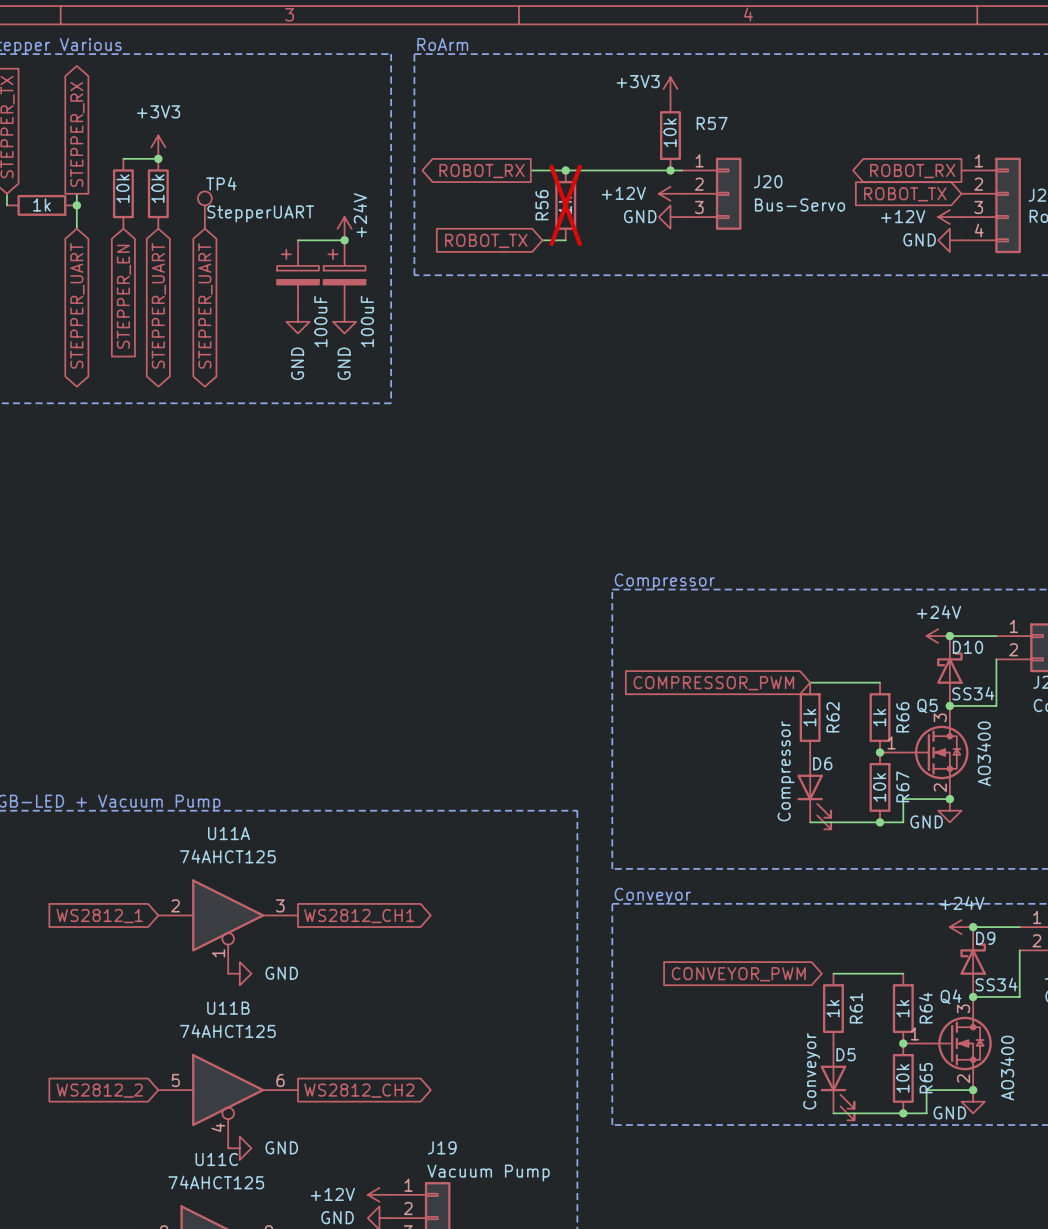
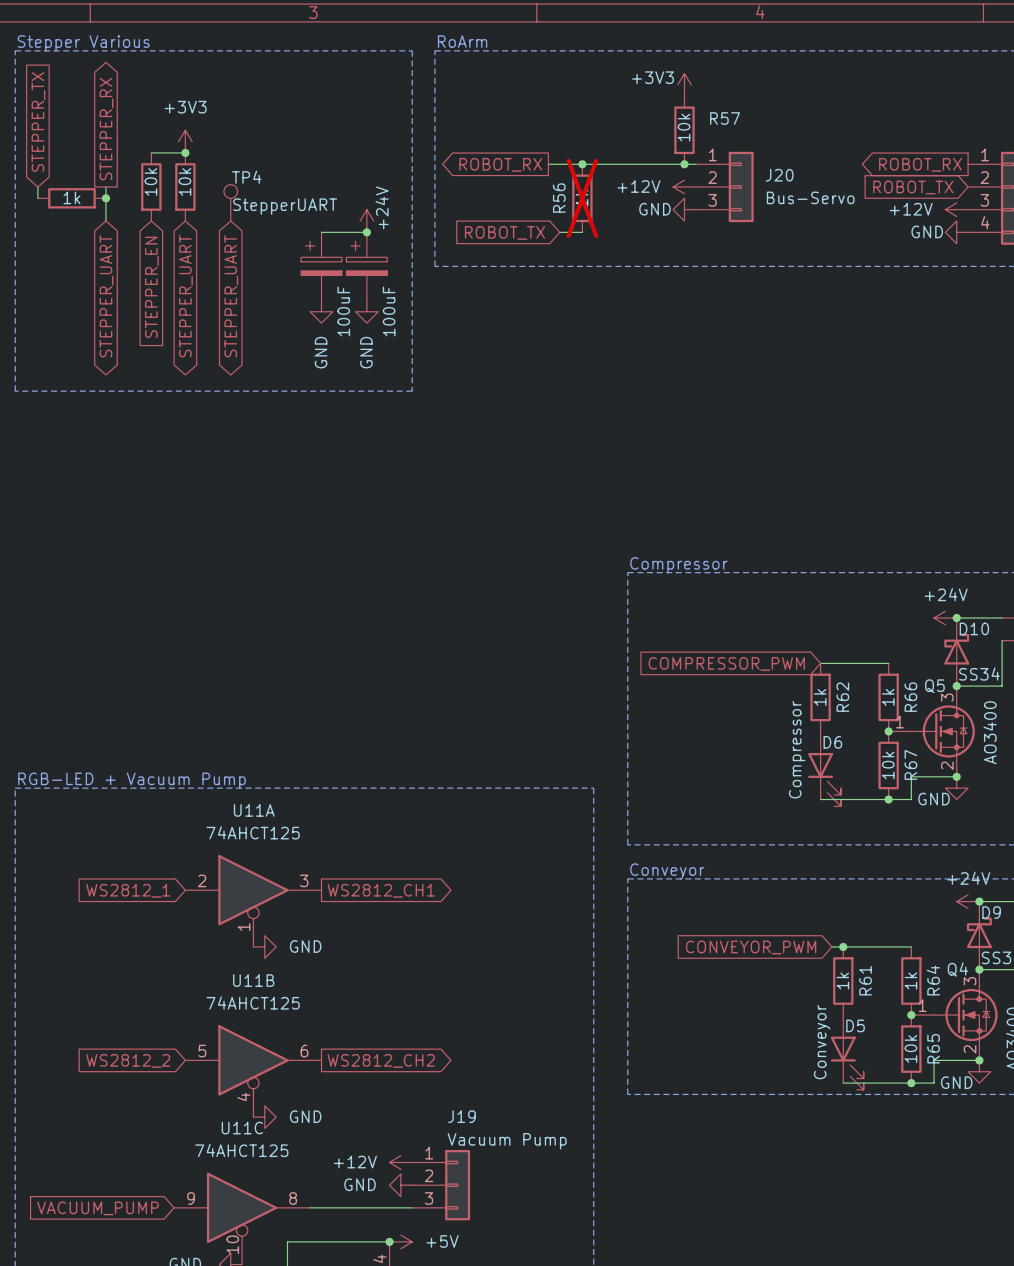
wire: none -> (831, 946) (843, 946)
junction: none -> (843, 946)

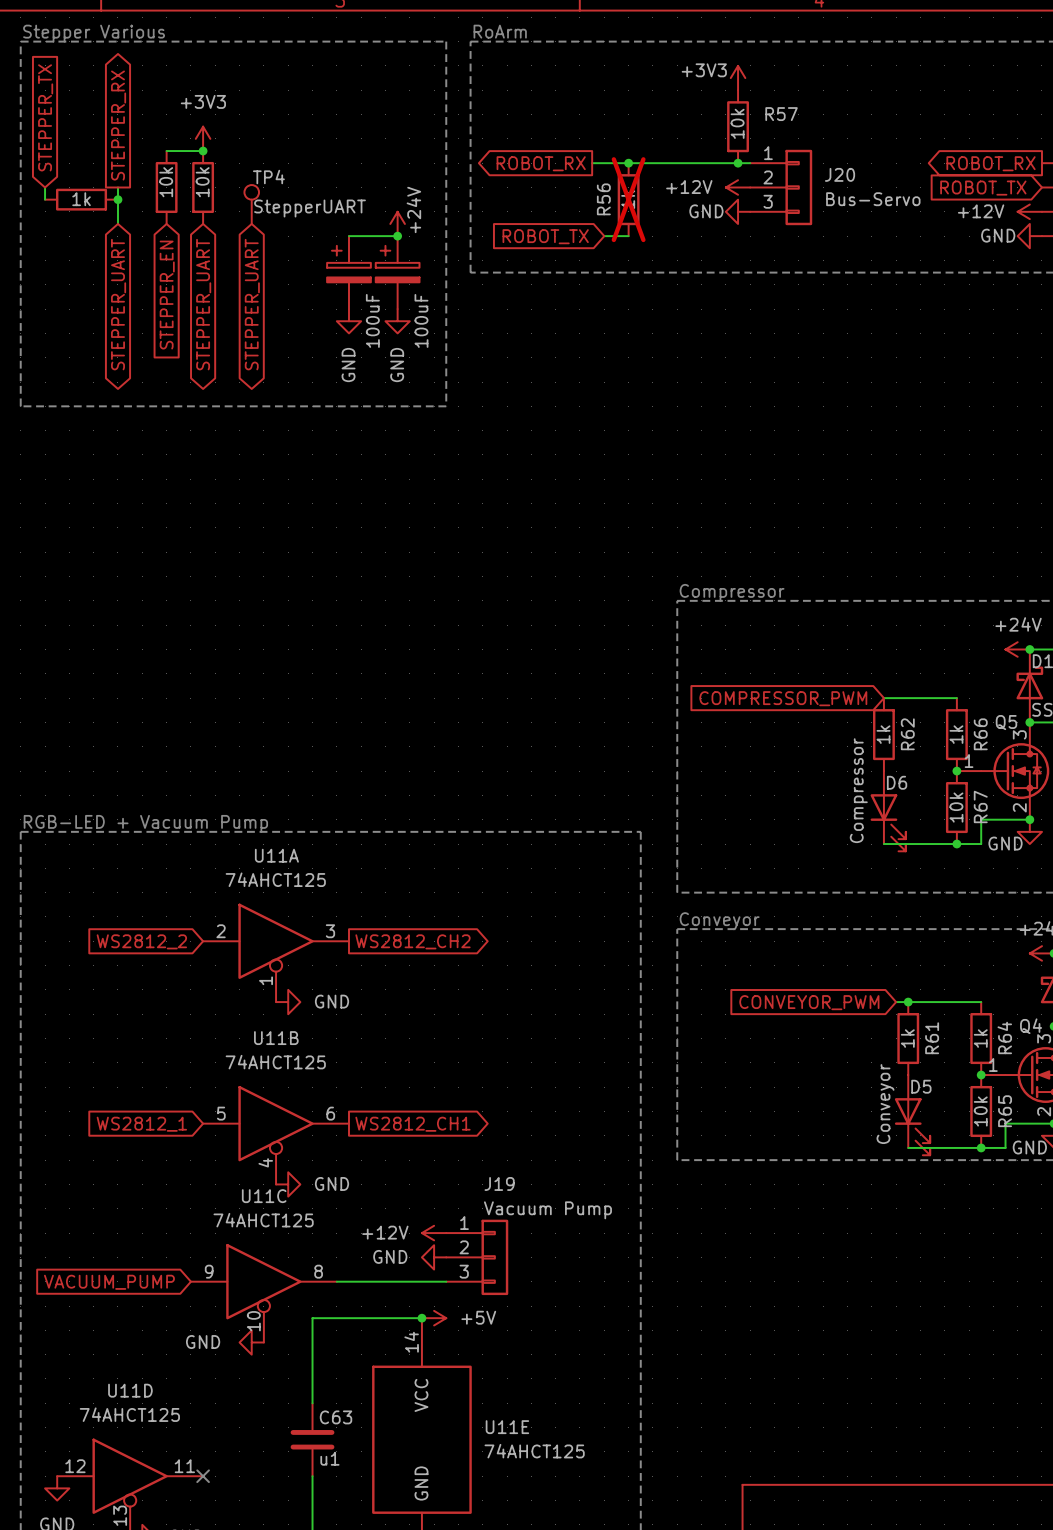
global label: WS2812_1 (128, 890) -> WS2812_2 (141, 941)
global label: WS2812_CH1 (381, 890) -> WS2812_CH2 (412, 941)
global label: WS2812_2 (128, 1060) -> WS2812_1 (141, 1124)
global label: WS2812_CH2 (381, 1060) -> WS2812_CH1 (412, 1124)

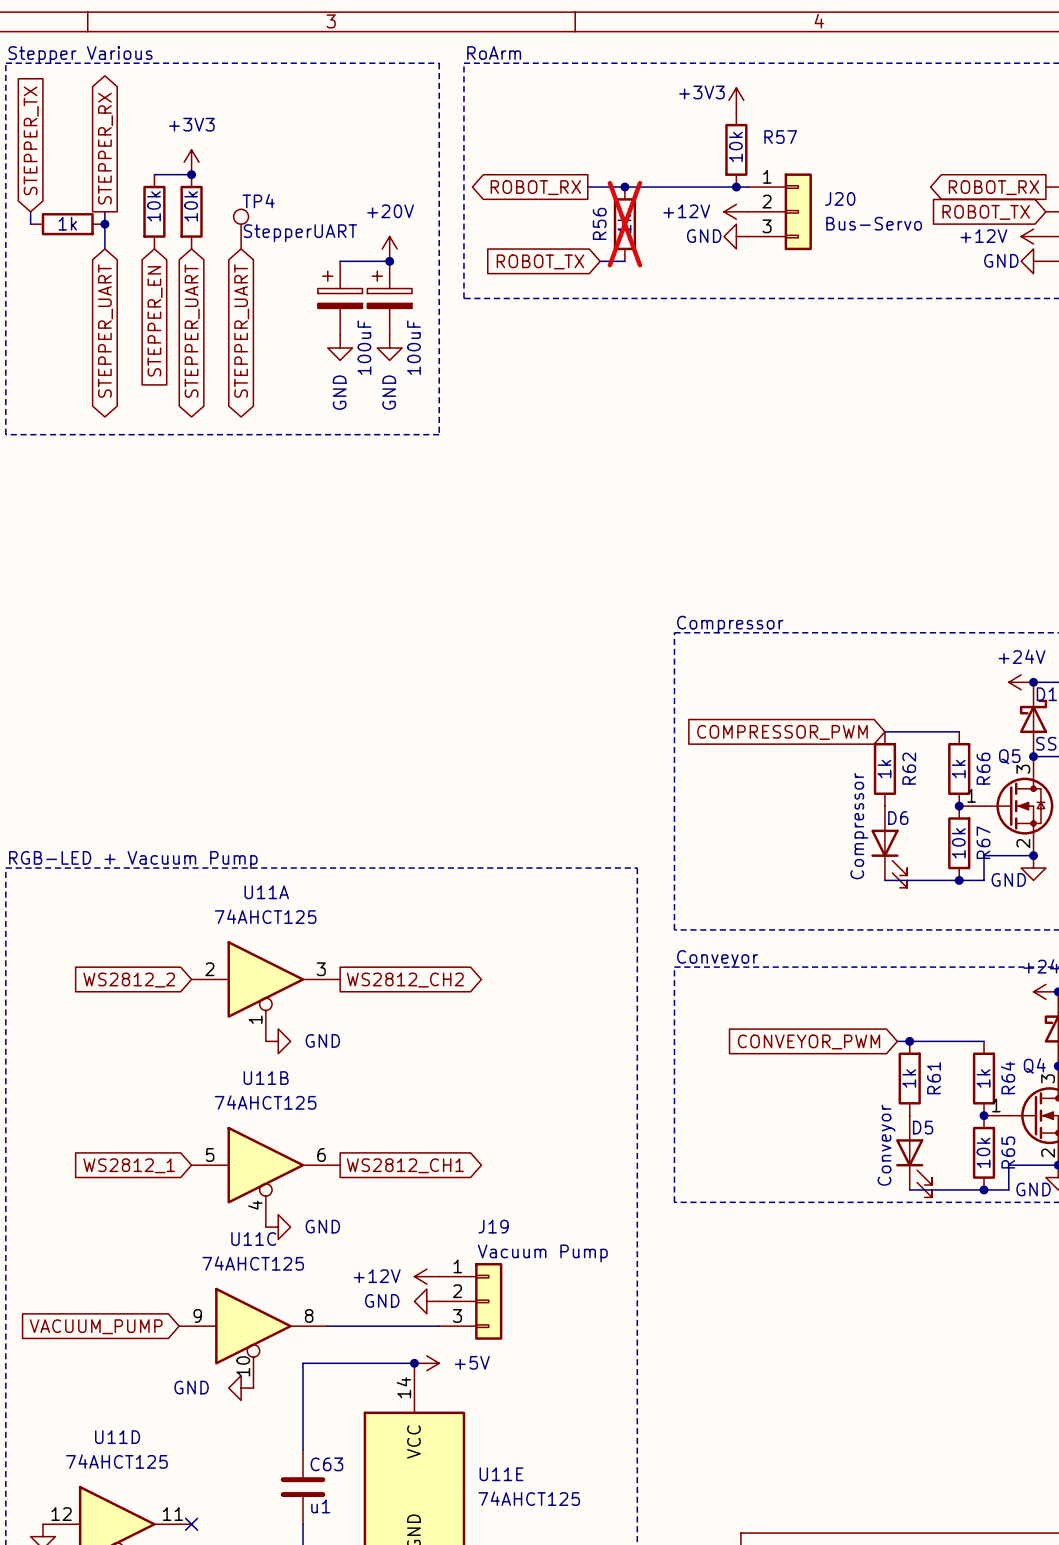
power symbol: +24V (397, 223) -> +20V (389, 248)

